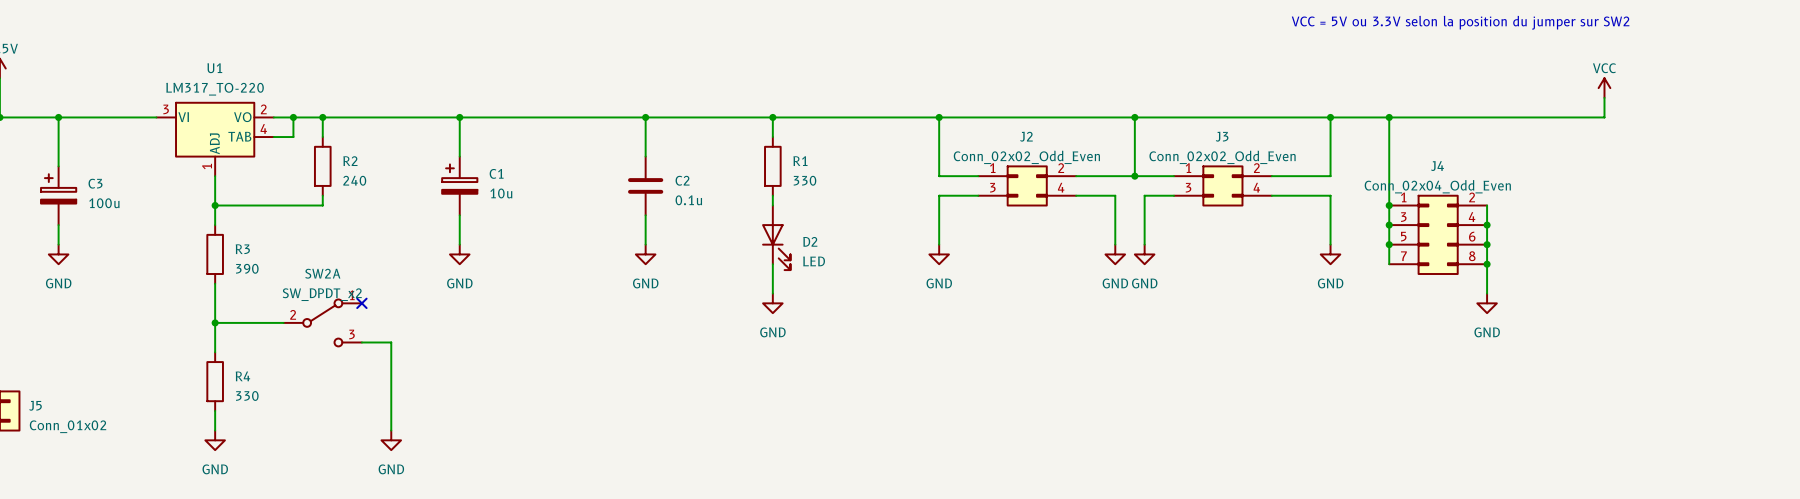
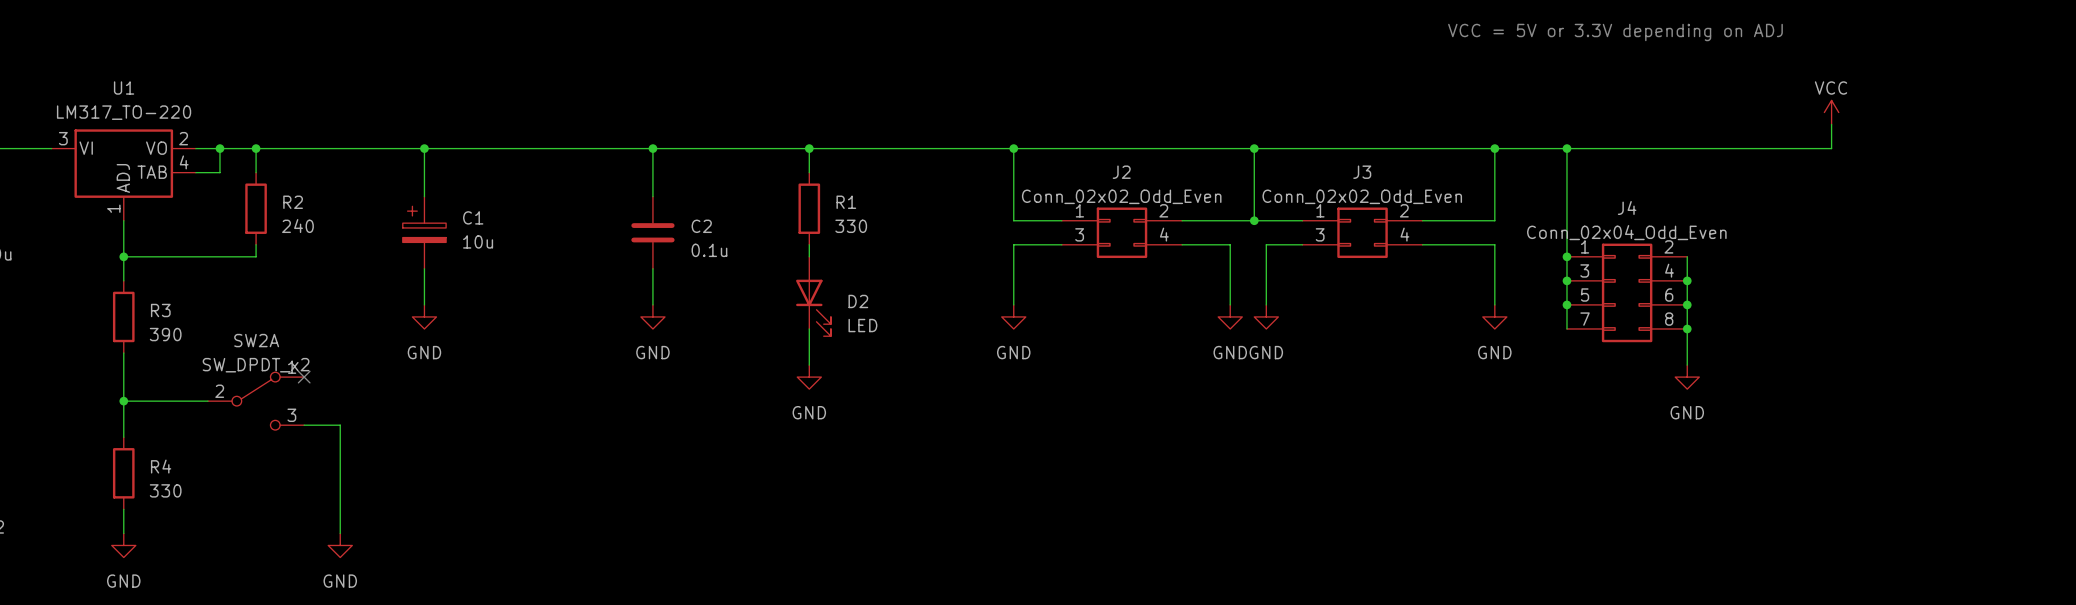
text: VCC = 5V ou 3.3V selon la position du jumper sur SW2 (1460, 22) -> VCC = 5V or 3.3V depending on ADJ (1615, 32)

